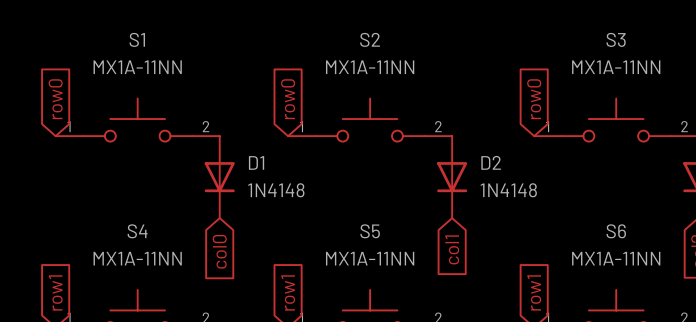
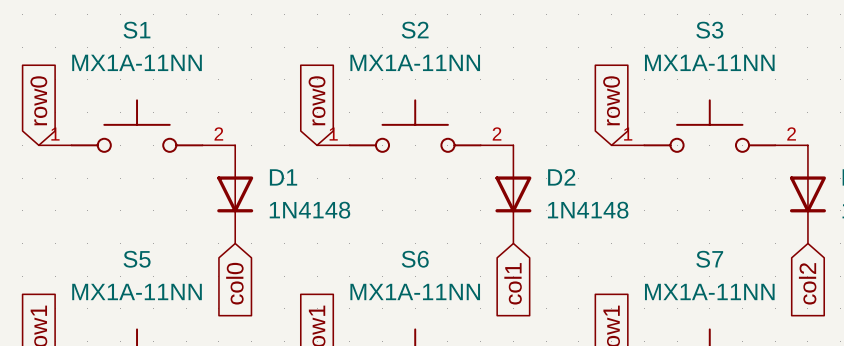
S4 name: S4 (137, 231) -> S5 (137, 259)
S5 name: S5 (370, 231) -> S6 (415, 259)
S6 name: S6 (616, 231) -> S7 (709, 259)

